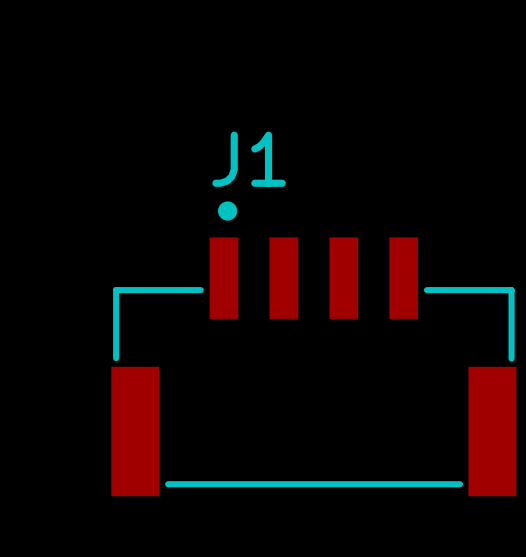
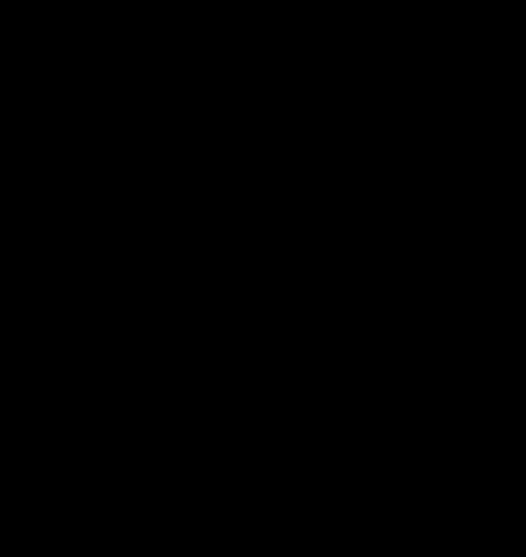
J1: (313, 348) -> none

